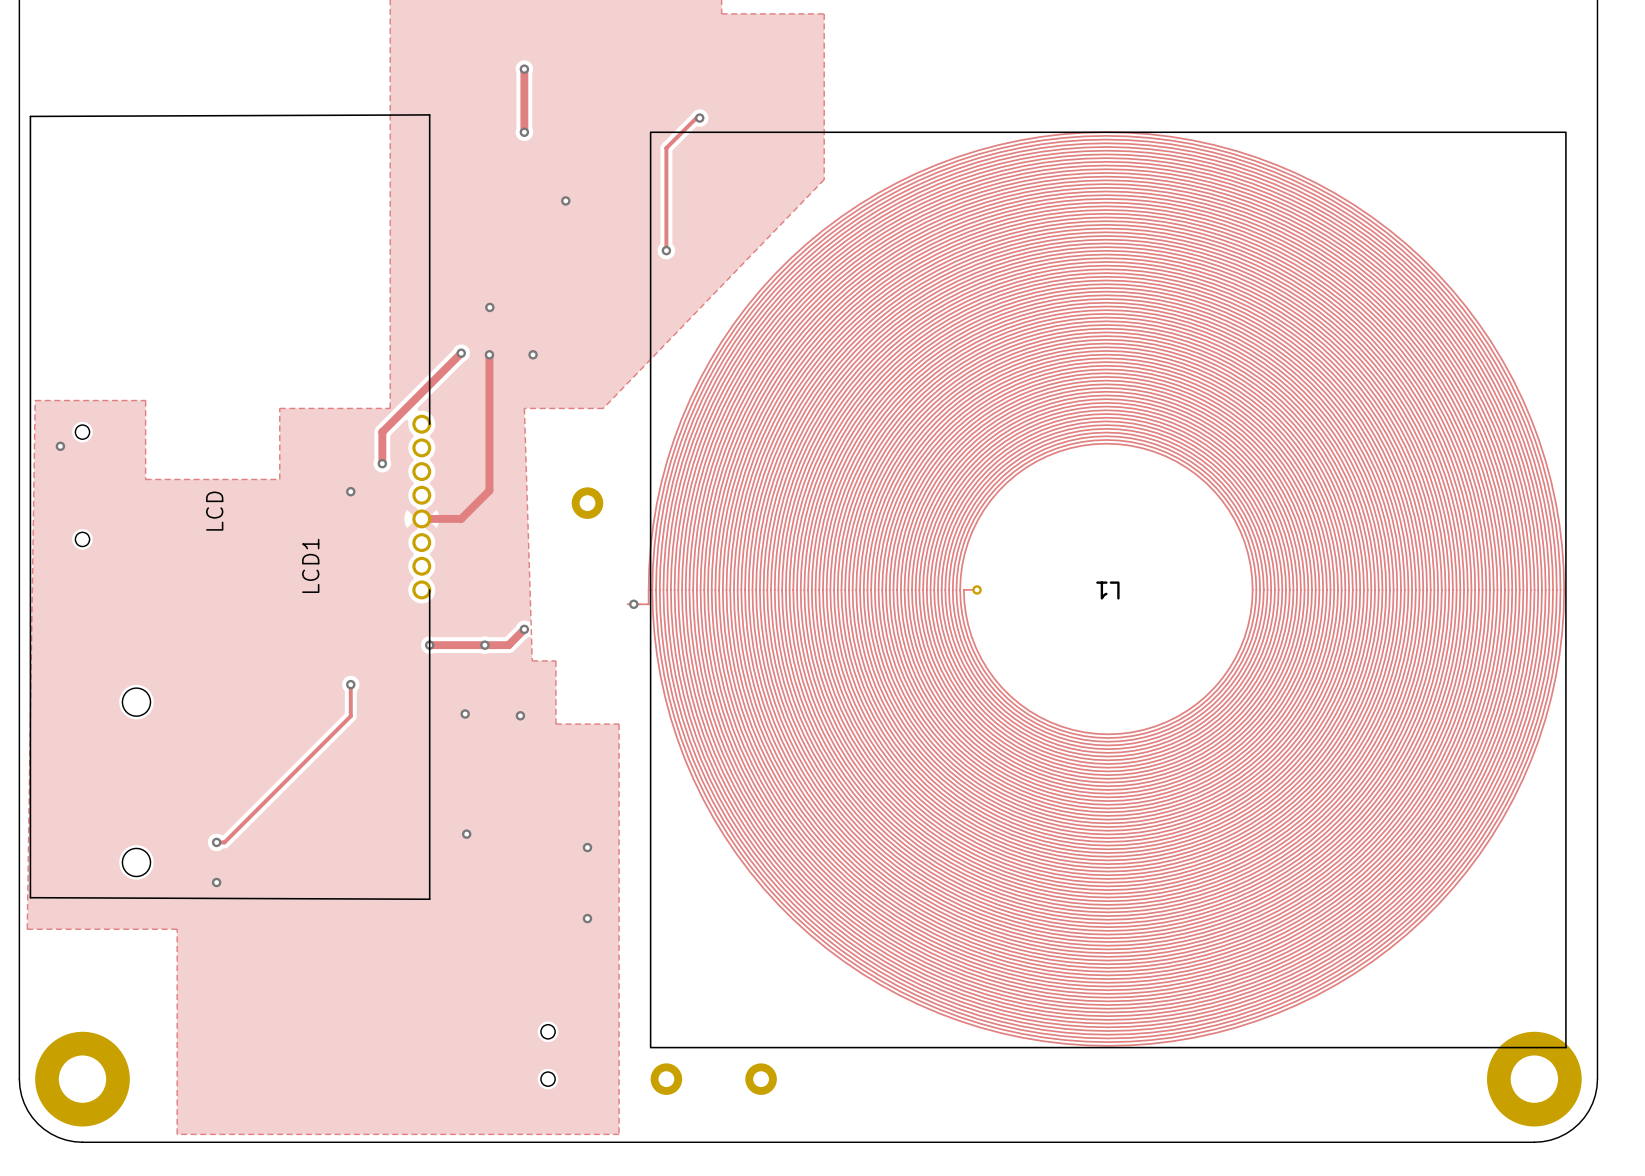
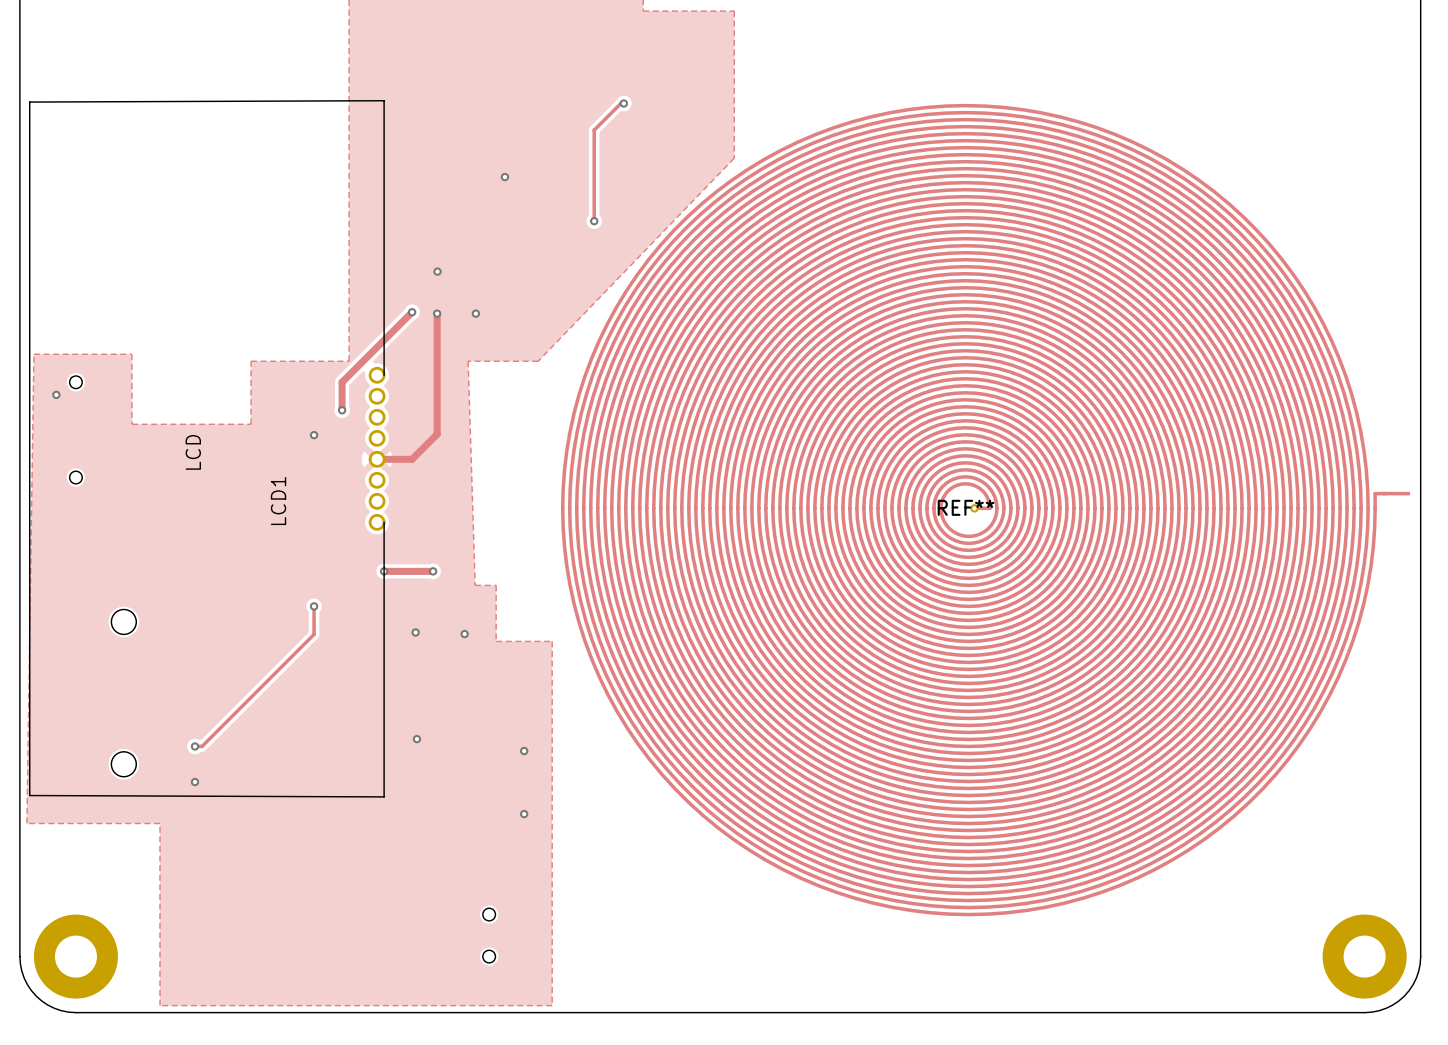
track: (524, 69) (524, 132) -> none
via: (524, 69) -> none
via: (524, 132) -> none
part: (587, 503) -> none
REF**: none -> (985, 510)
L1: (1096, 589) -> none
via: (633, 604) -> none
track: (524, 629) (508, 645) (484, 645) -> none
via: (524, 629) -> none
part: (666, 1079) -> none
part: (761, 1079) -> none

